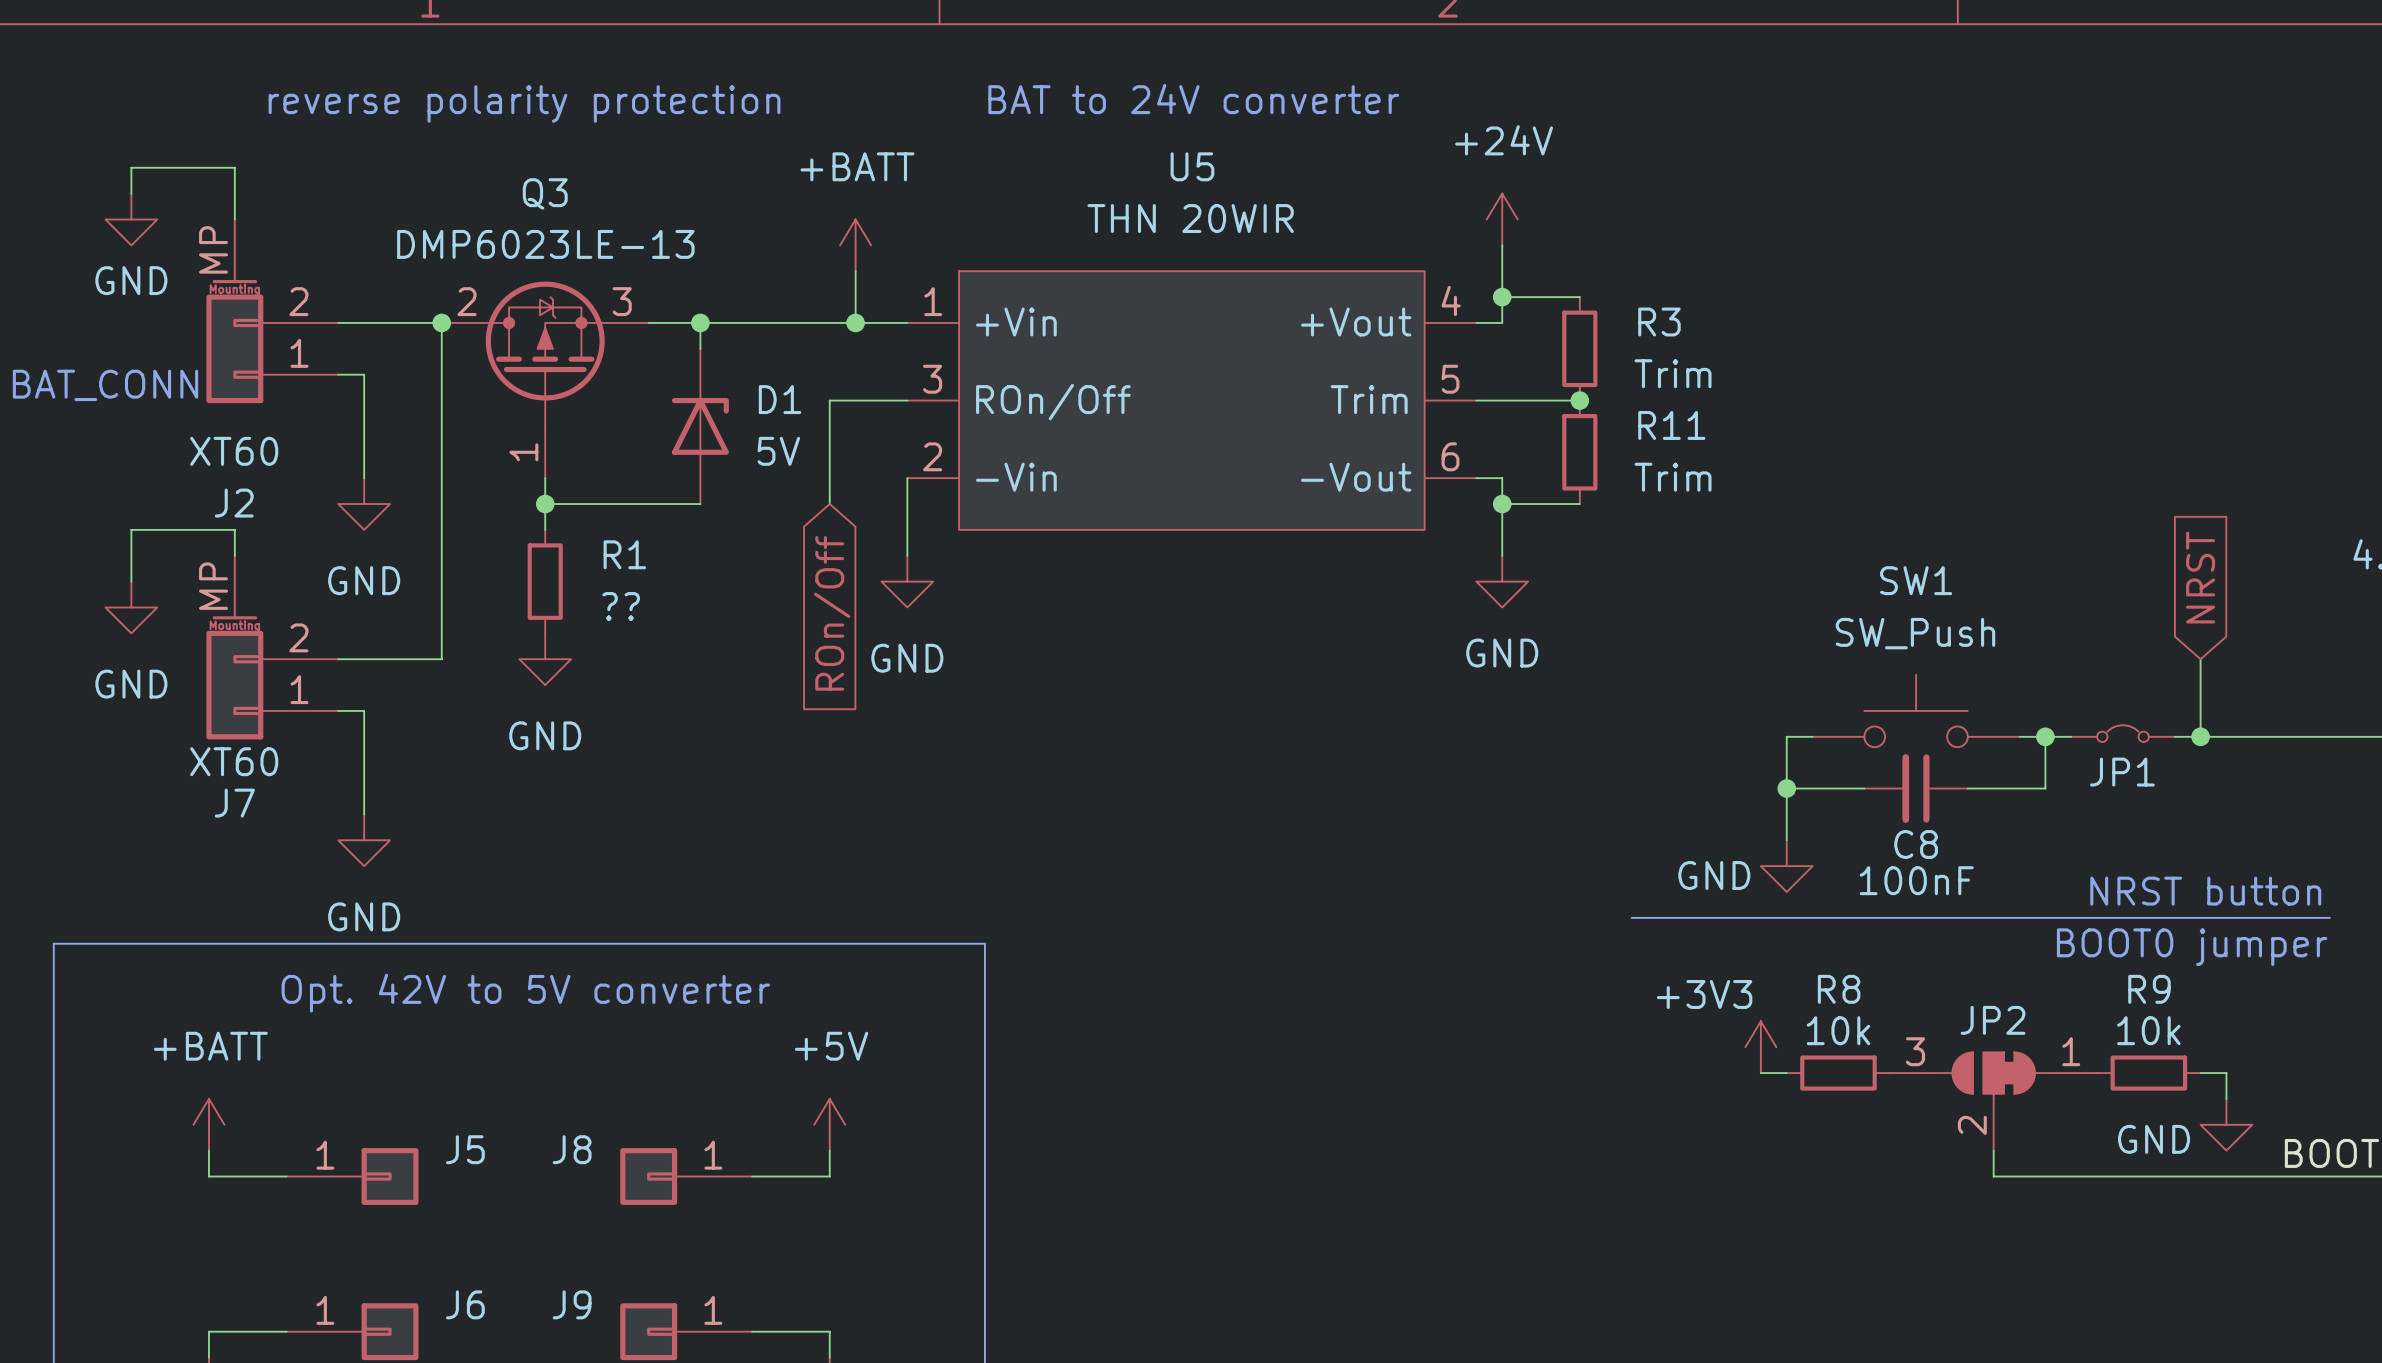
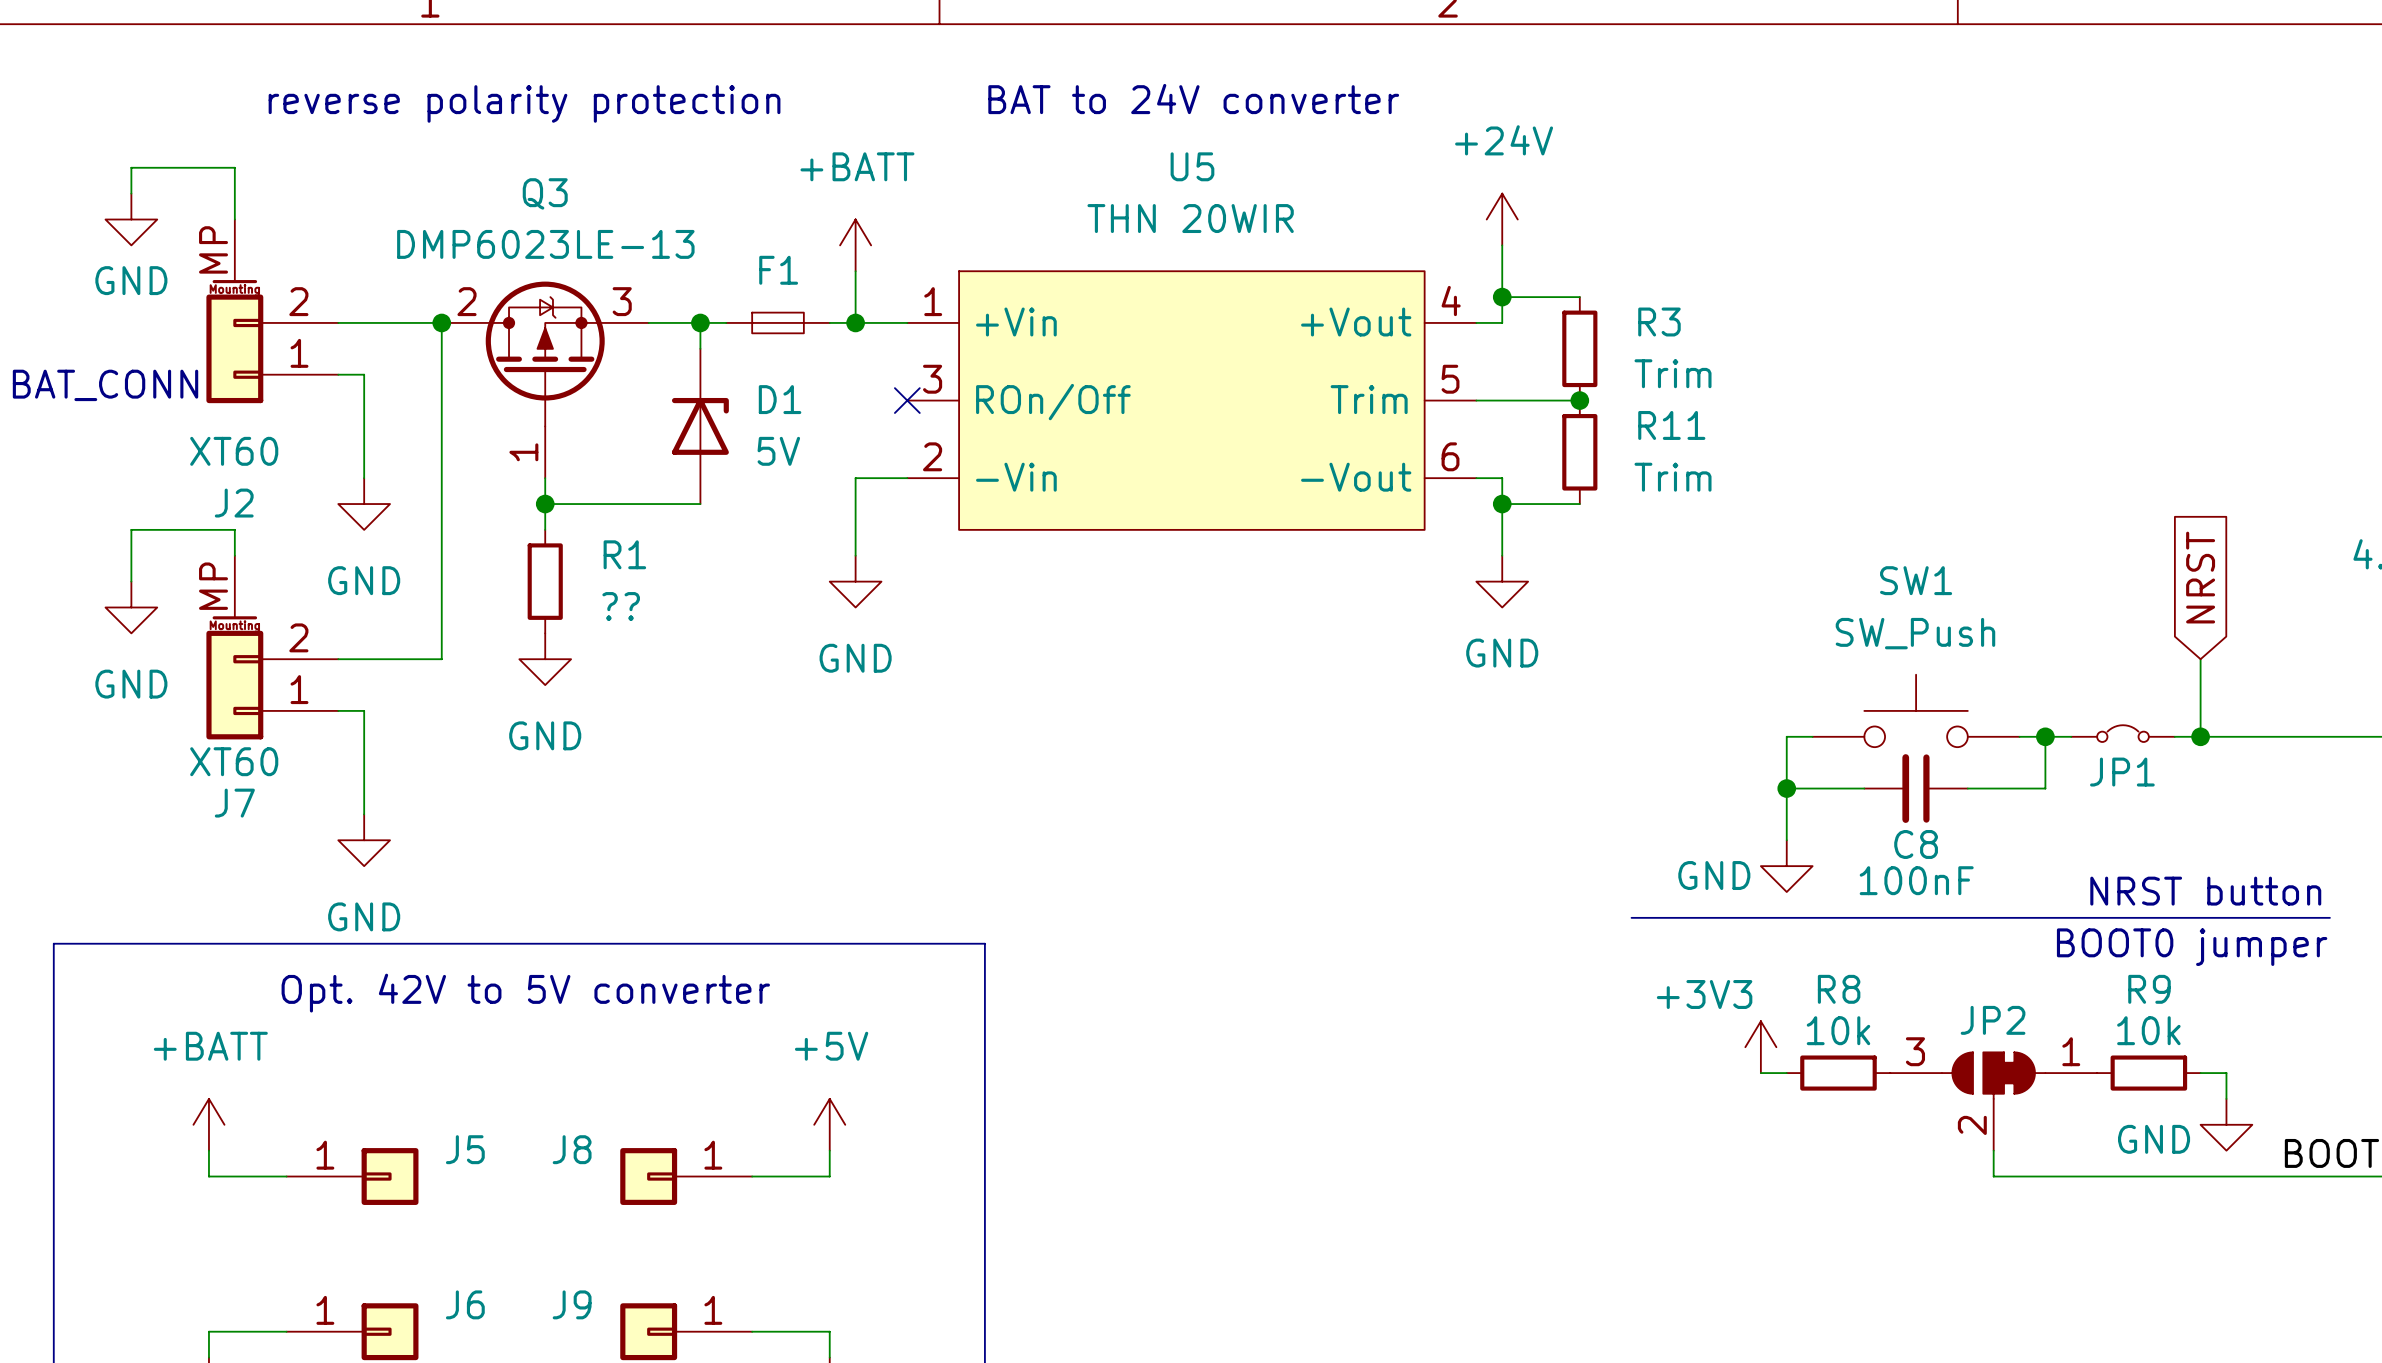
F1: none -> (778, 322)
wire: (907, 400) (829, 400) (829, 504) -> none
no-connect mark: none -> (907, 400)
wire: (907, 478) (907, 555) -> (907, 478) (855, 478) (855, 555)
power symbol position: GND (907, 581) -> GND (855, 581)
global label: ROn/Off (832, 613) -> none

